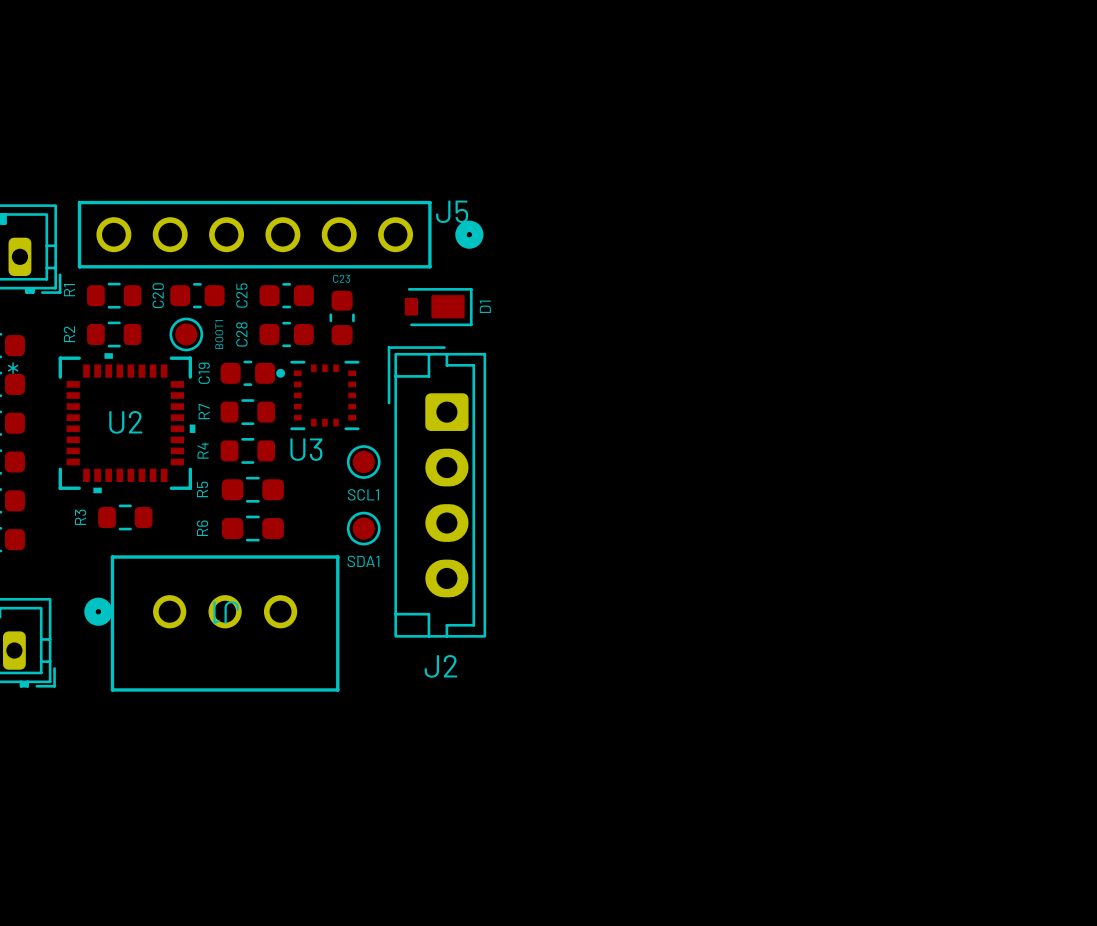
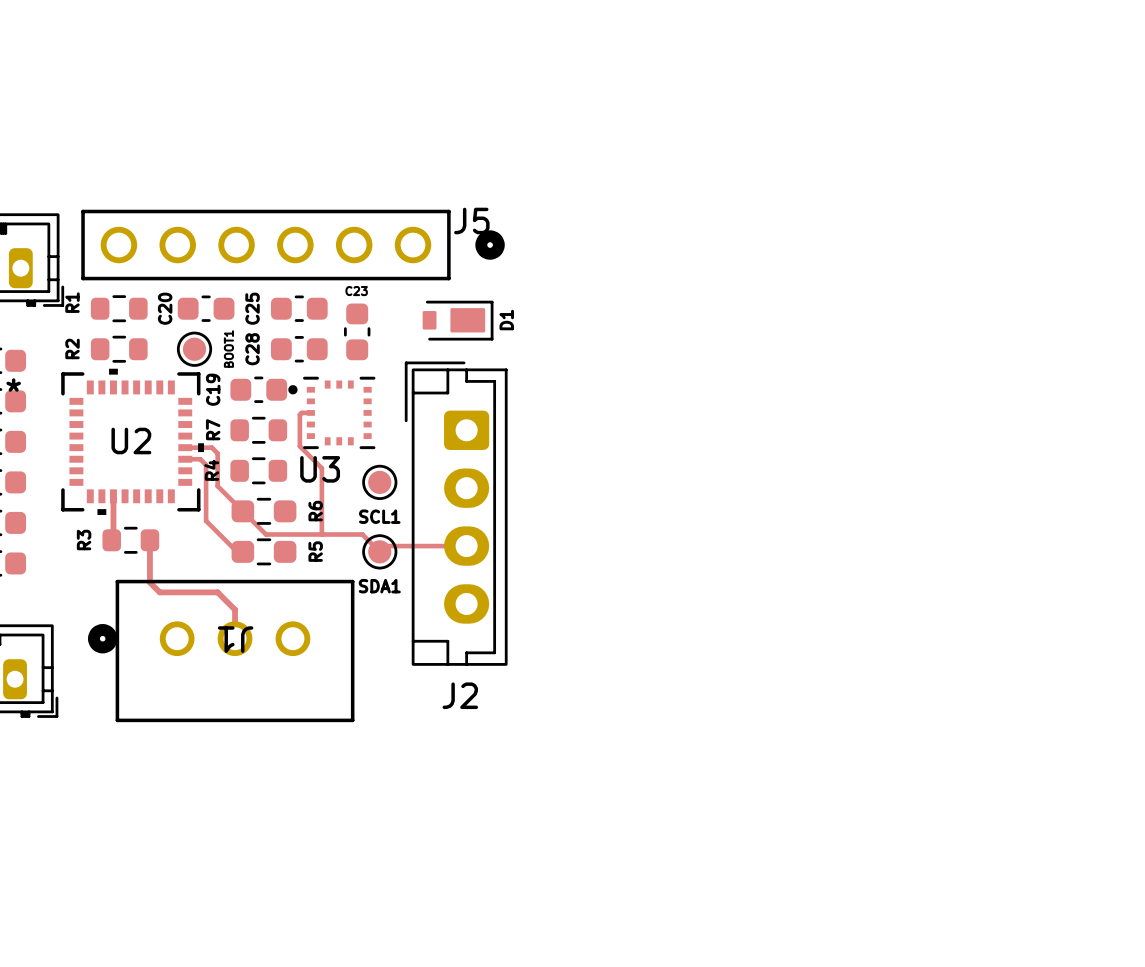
top track: none -> (310, 412) (299, 414) (299, 446) (321, 468) (321, 534)
top track: none -> (185, 447) (211, 447) (217, 453) (217, 486) (266, 534) (362, 534) (379, 551) (385, 546) (466, 546)
top track: none -> (185, 459) (200, 459) (206, 465) (206, 520) (242, 557)
top track: none -> (113, 496) (113, 538) (111, 540)
R5 name: R5 (202, 489) -> R6 (315, 511)
top track: none -> (149, 540) (149, 582) (159, 592) (217, 592) (235, 609) (235, 638)
R6 name: R6 (202, 528) -> R5 (315, 551)

